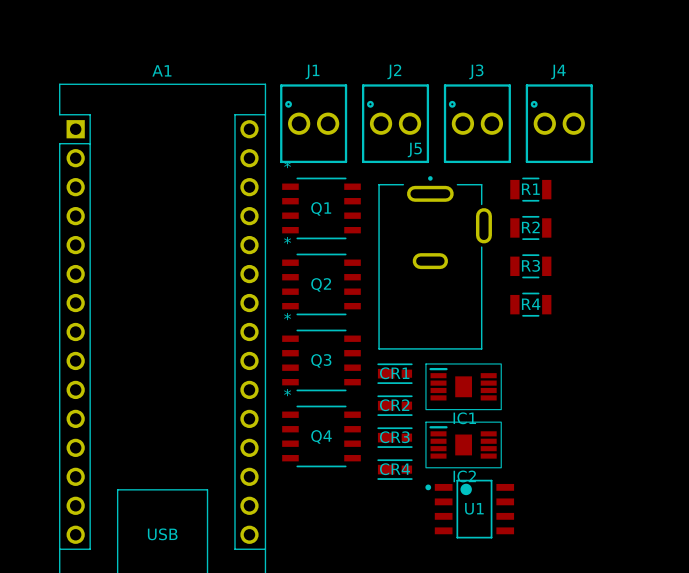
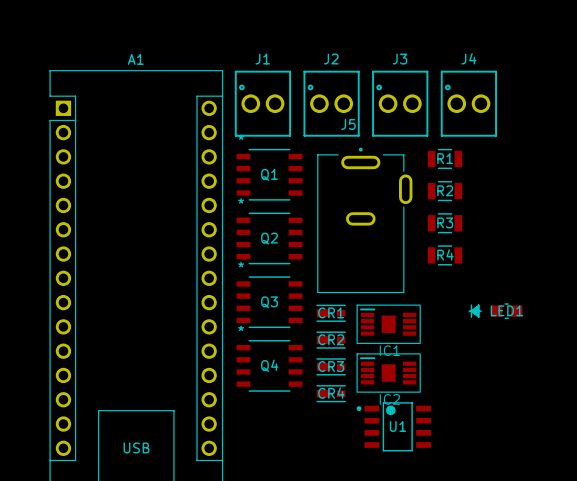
LED1: none -> (495, 311)

